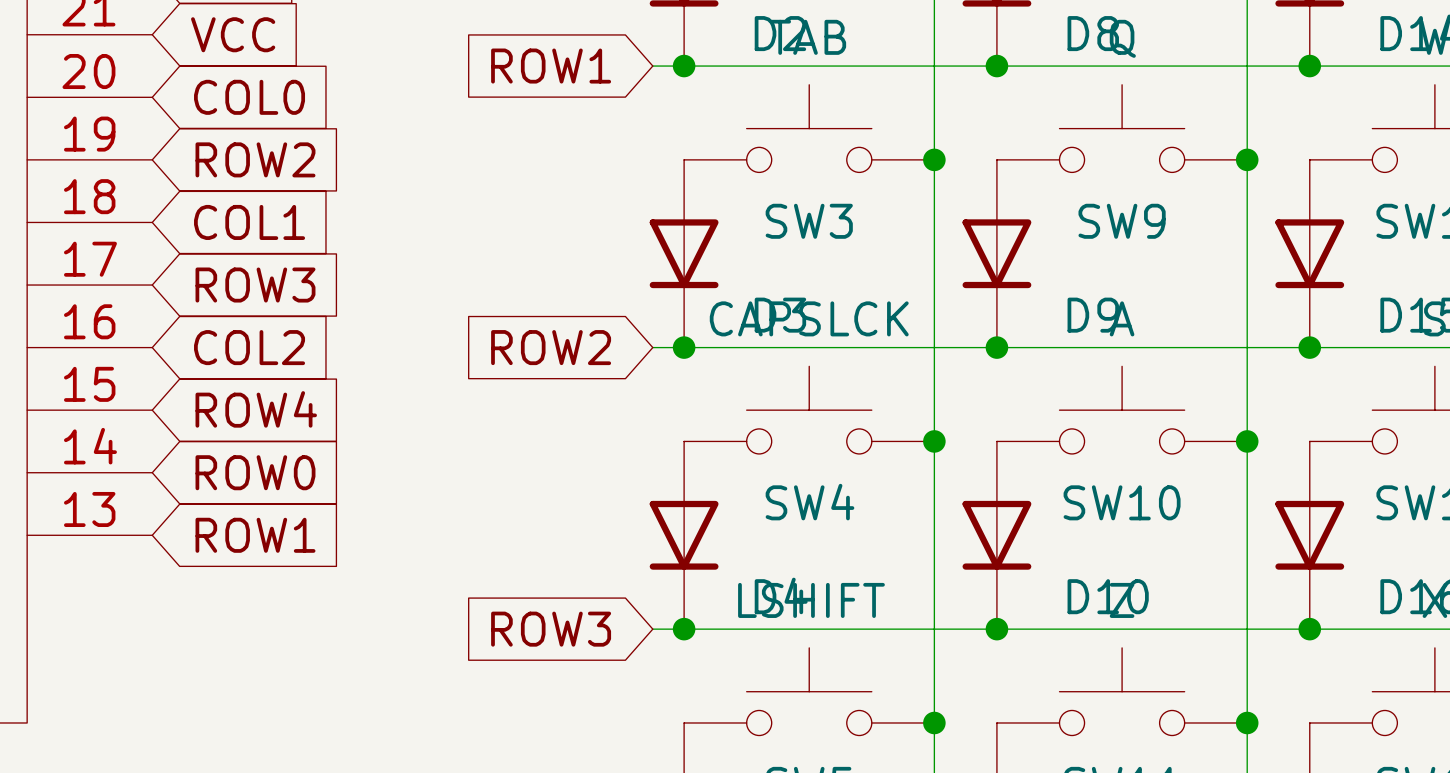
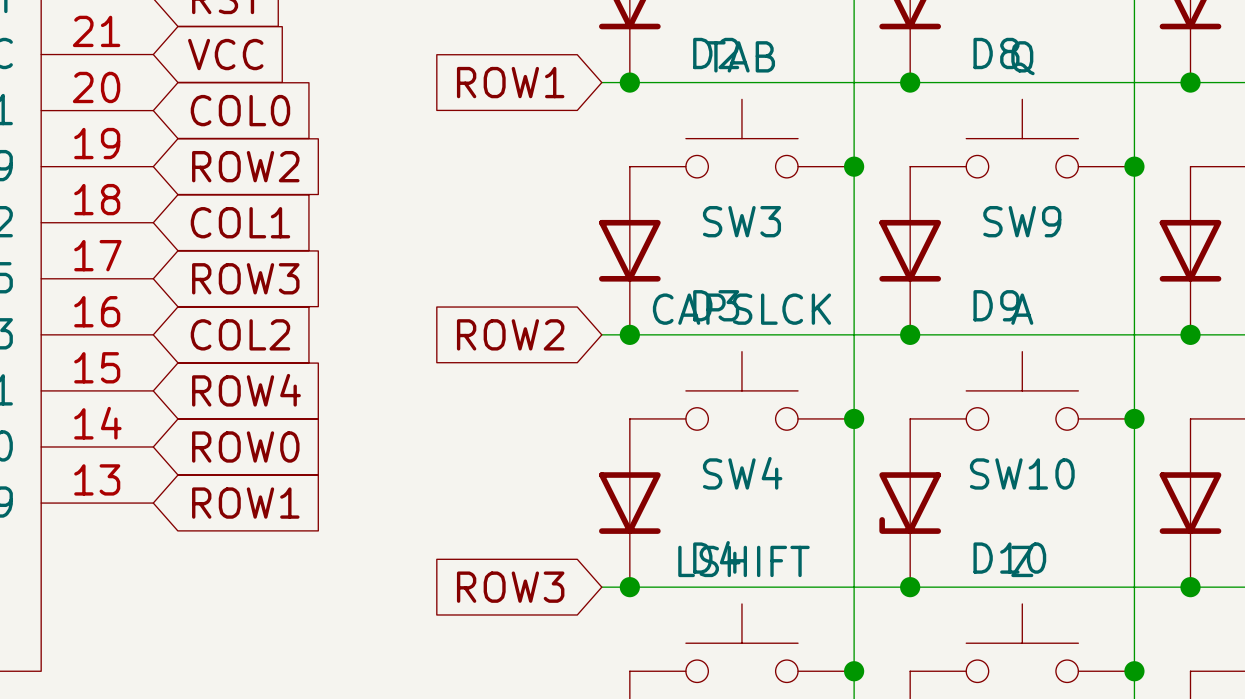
D10 symbol: [962, 441, 1032, 630] -> [879, 418, 942, 588]

